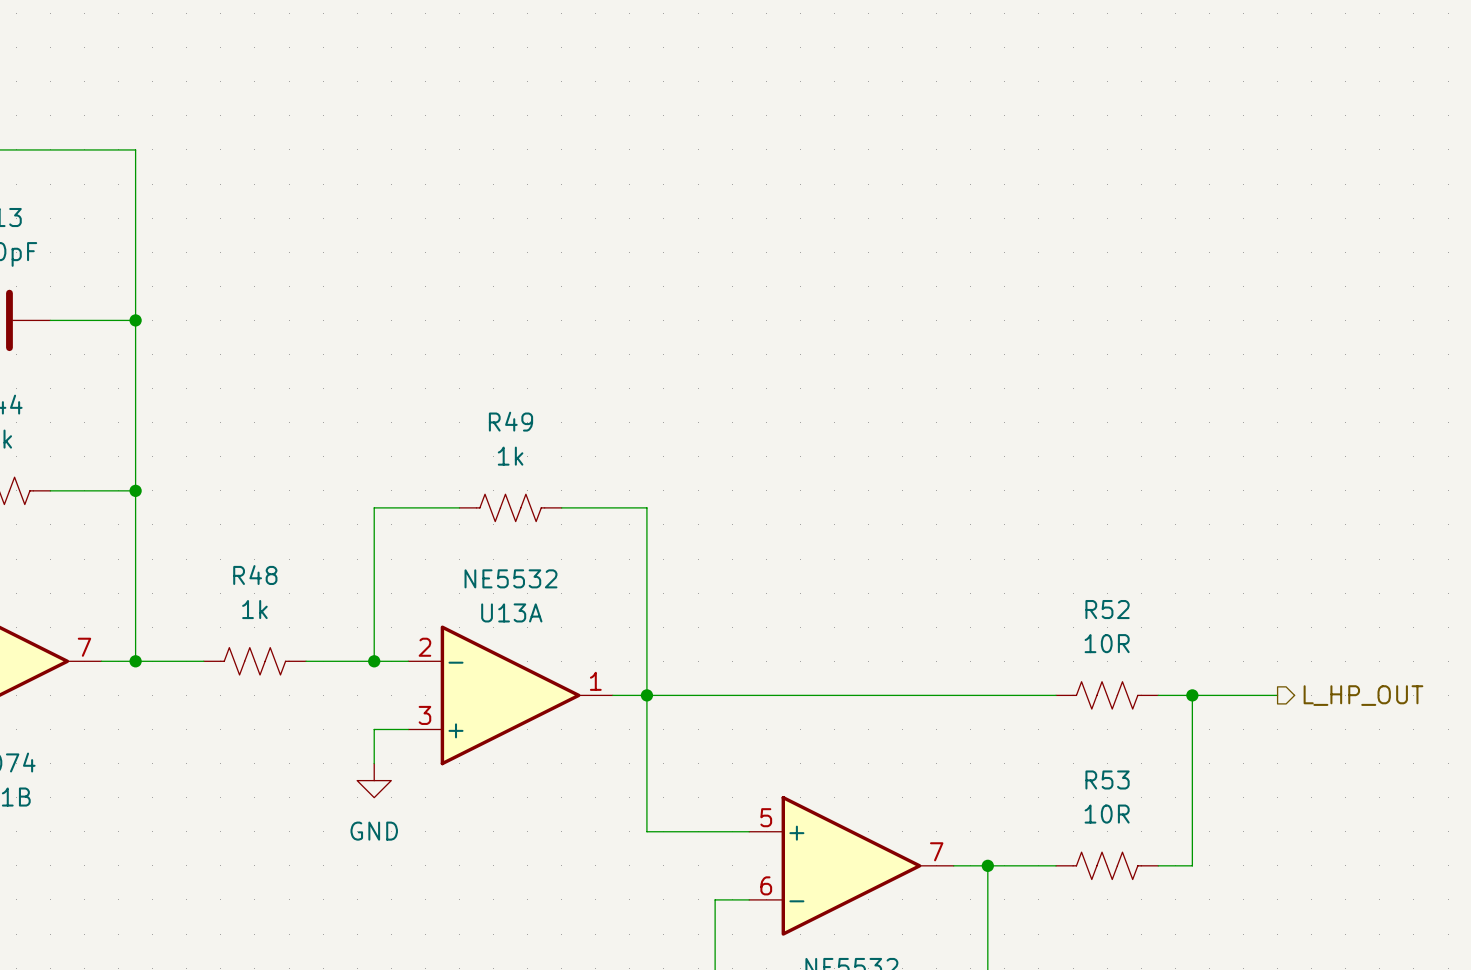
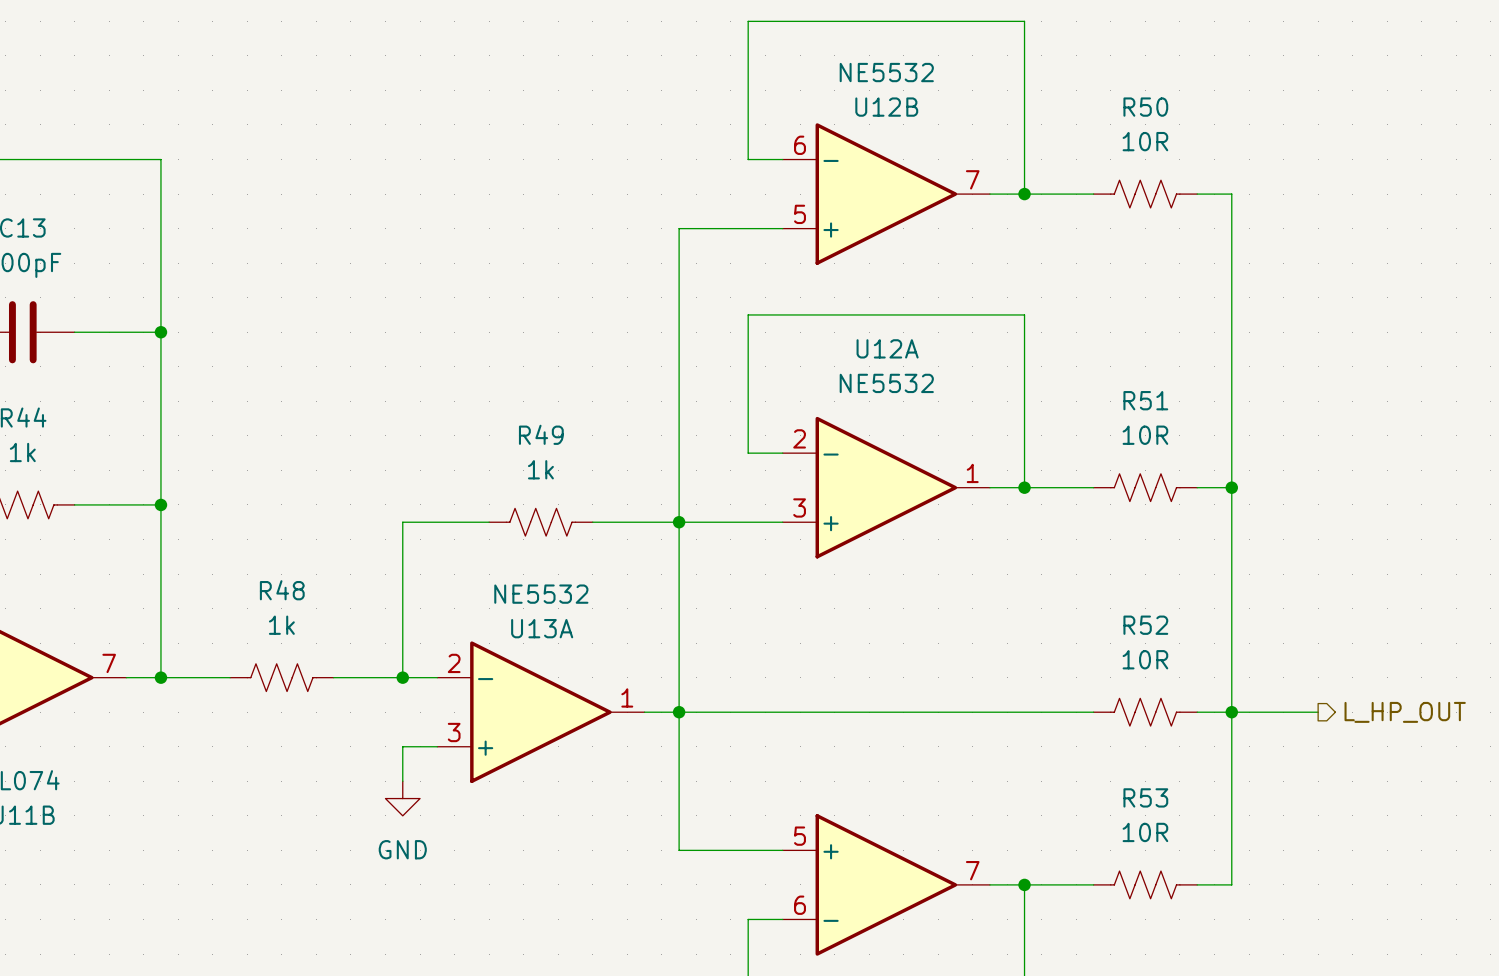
wire: none -> (782, 159) (748, 159) (748, 21) (1024, 21) (1024, 194)
U12B: none -> NE5532 (886, 194)
wire: none -> (989, 194) (1093, 194)
junction: none -> (1024, 194)
R50: none -> 10R (1145, 194)
wire: none -> (1197, 194) (1231, 194) (1231, 712)
wire: none -> (782, 228) (679, 228) (679, 522) (782, 522)
wire: none -> (782, 453) (748, 453) (748, 314) (1024, 314) (1024, 487)
U12A: none -> NE5532 (886, 487)
wire: none -> (989, 487) (1093, 487)
junction: none -> (1024, 487)
R51: none -> 10R (1145, 487)
wire: none -> (1197, 487) (1231, 487)
junction: none -> (1231, 487)
junction: none -> (679, 522)

